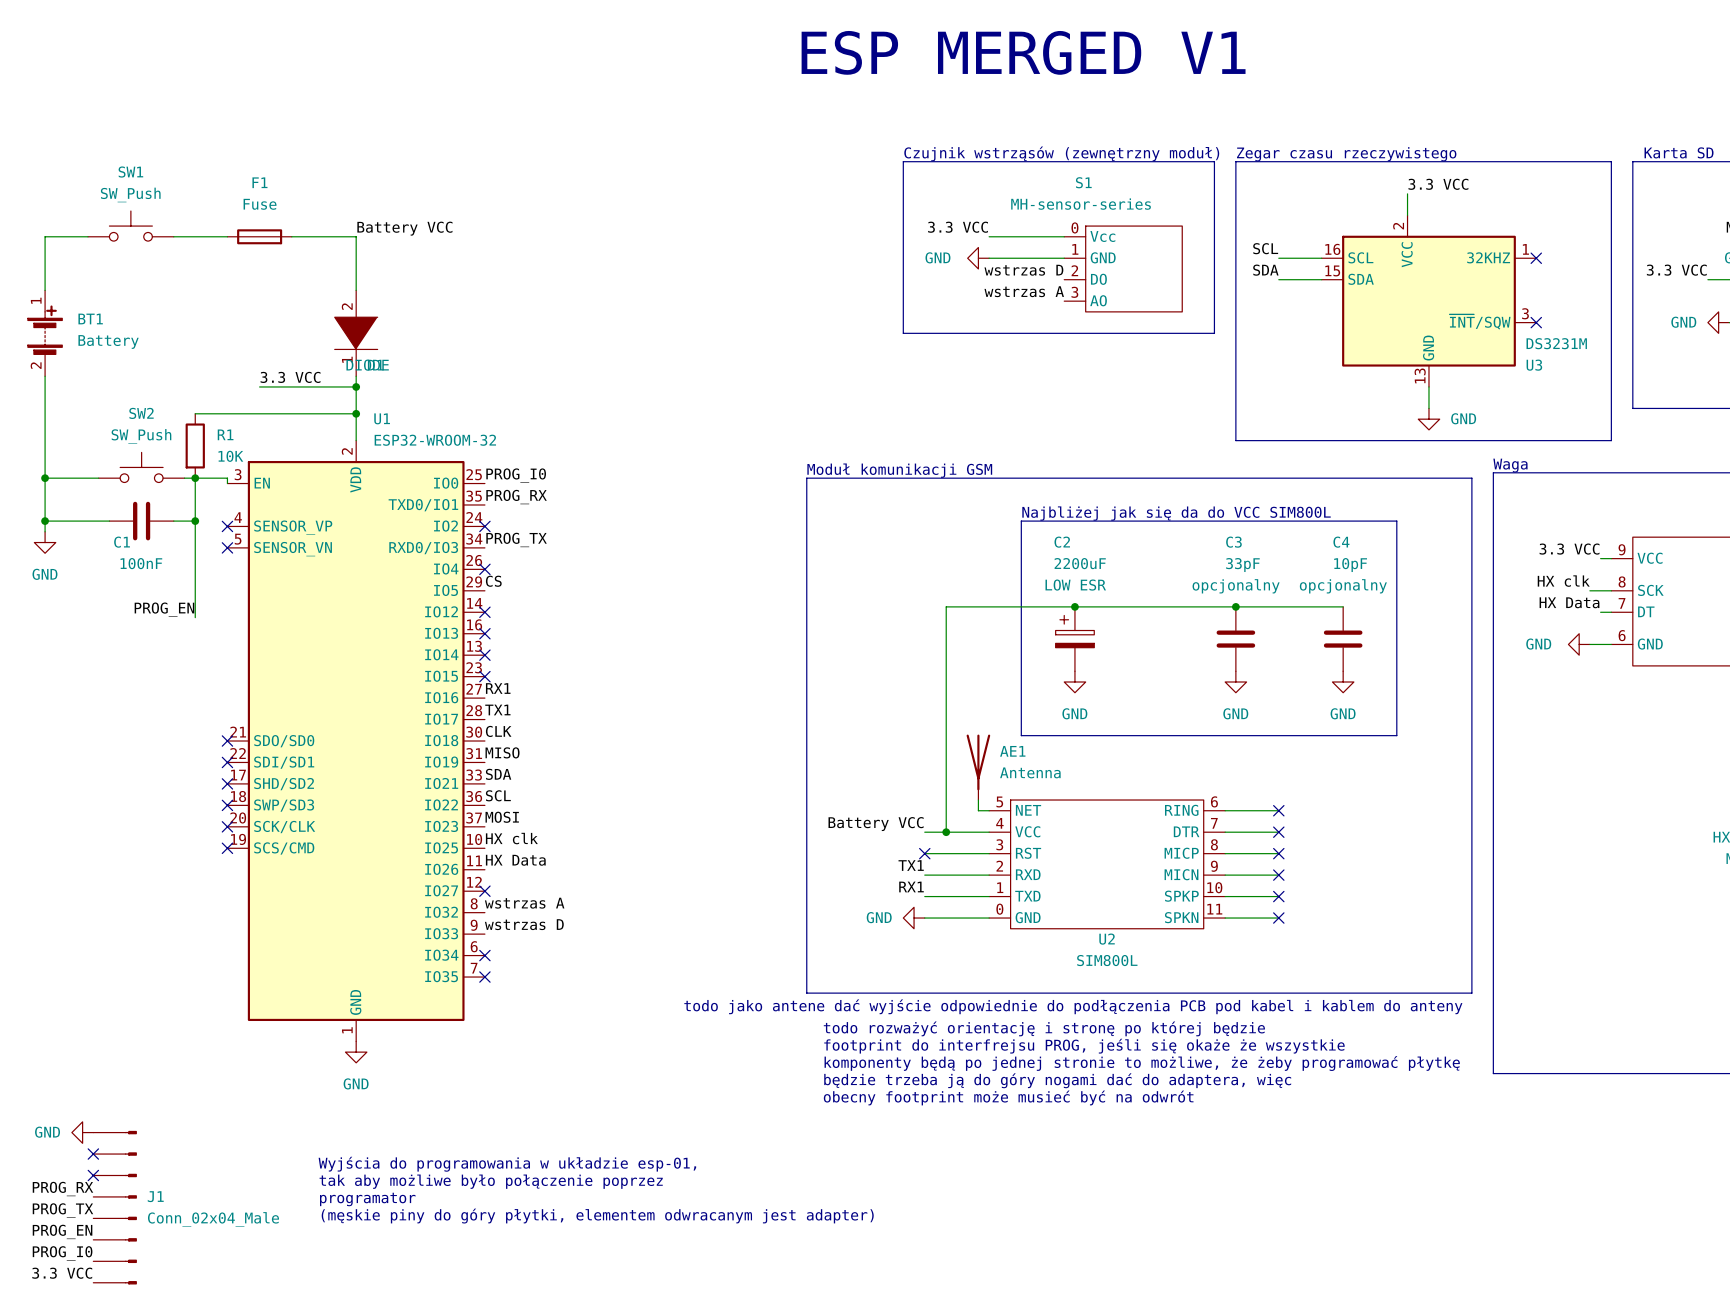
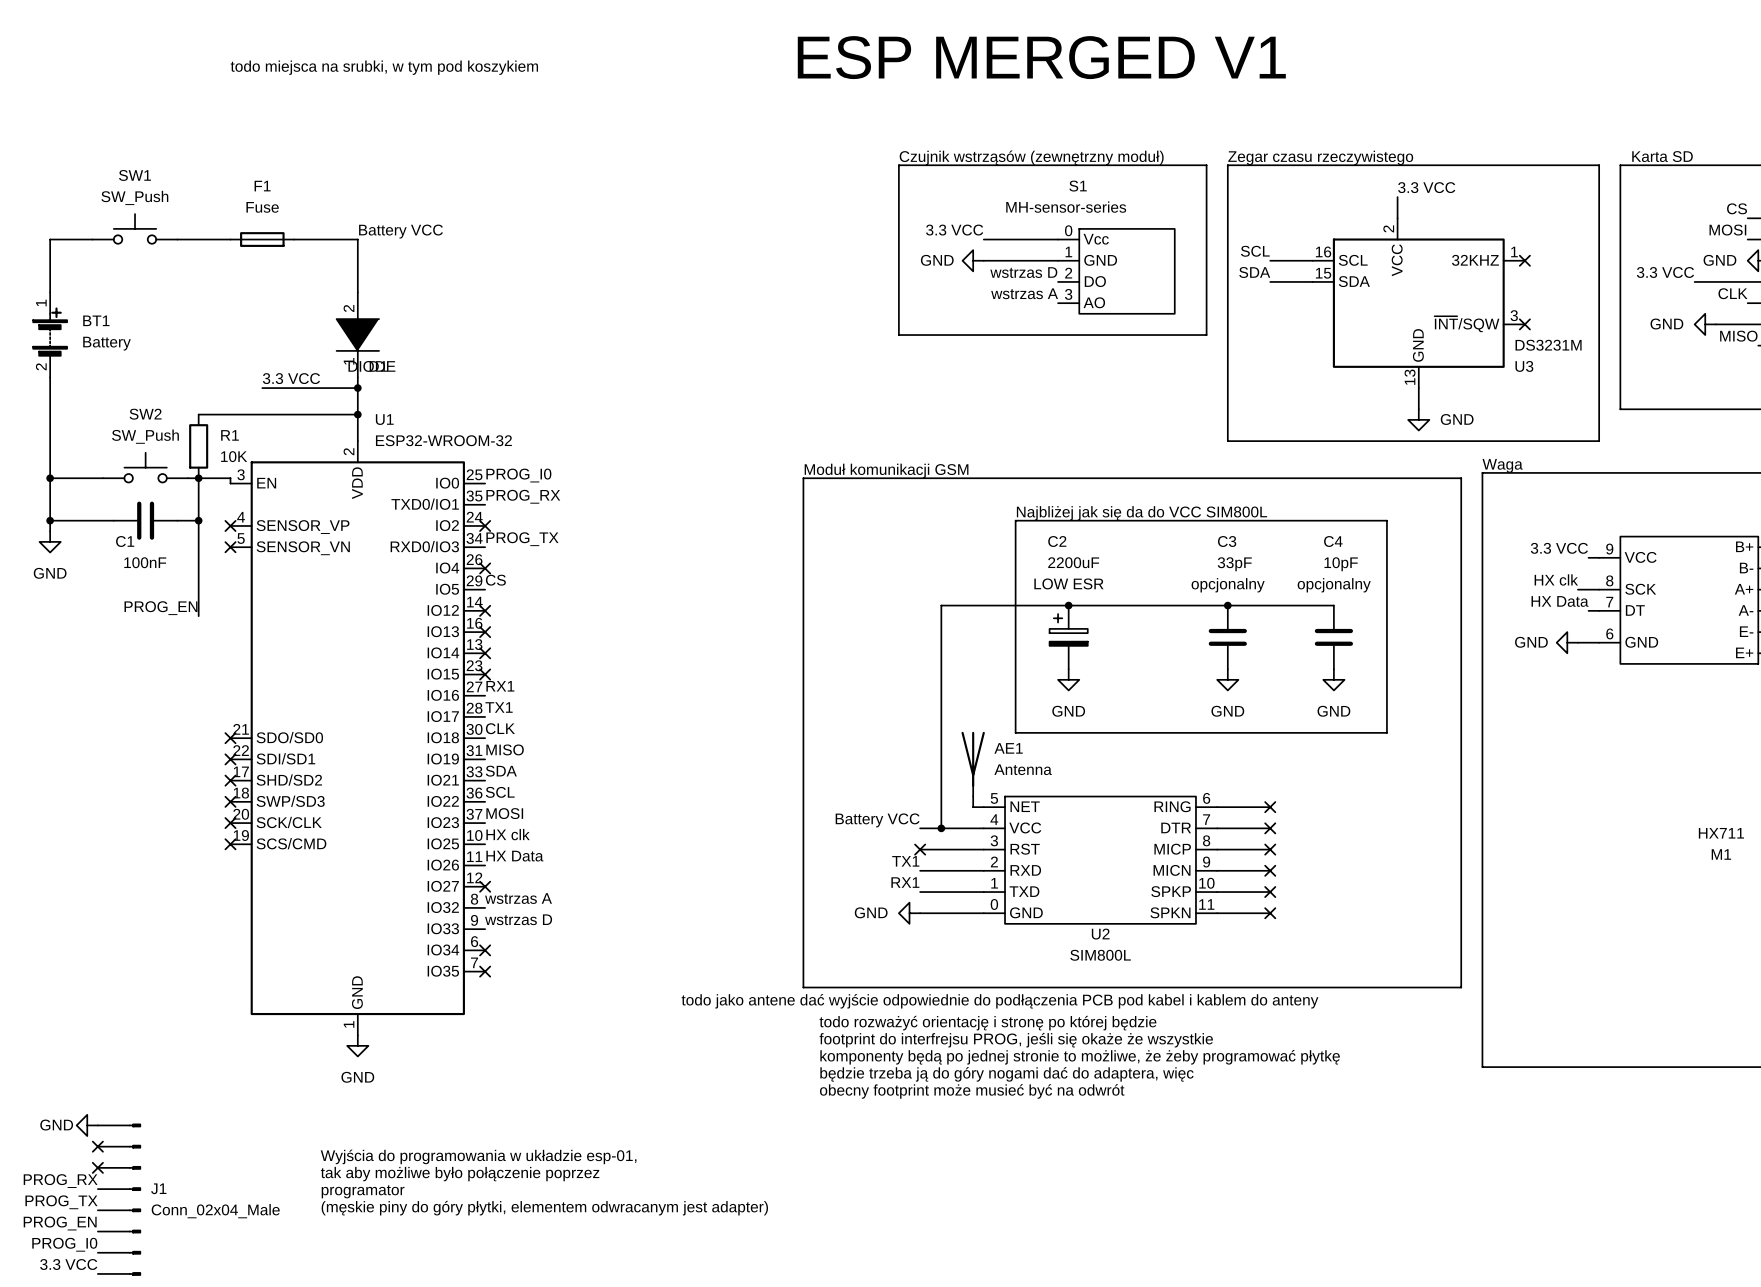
text: none -> todo miejsca na srubki, w tym pod koszykiem (384, 67)

